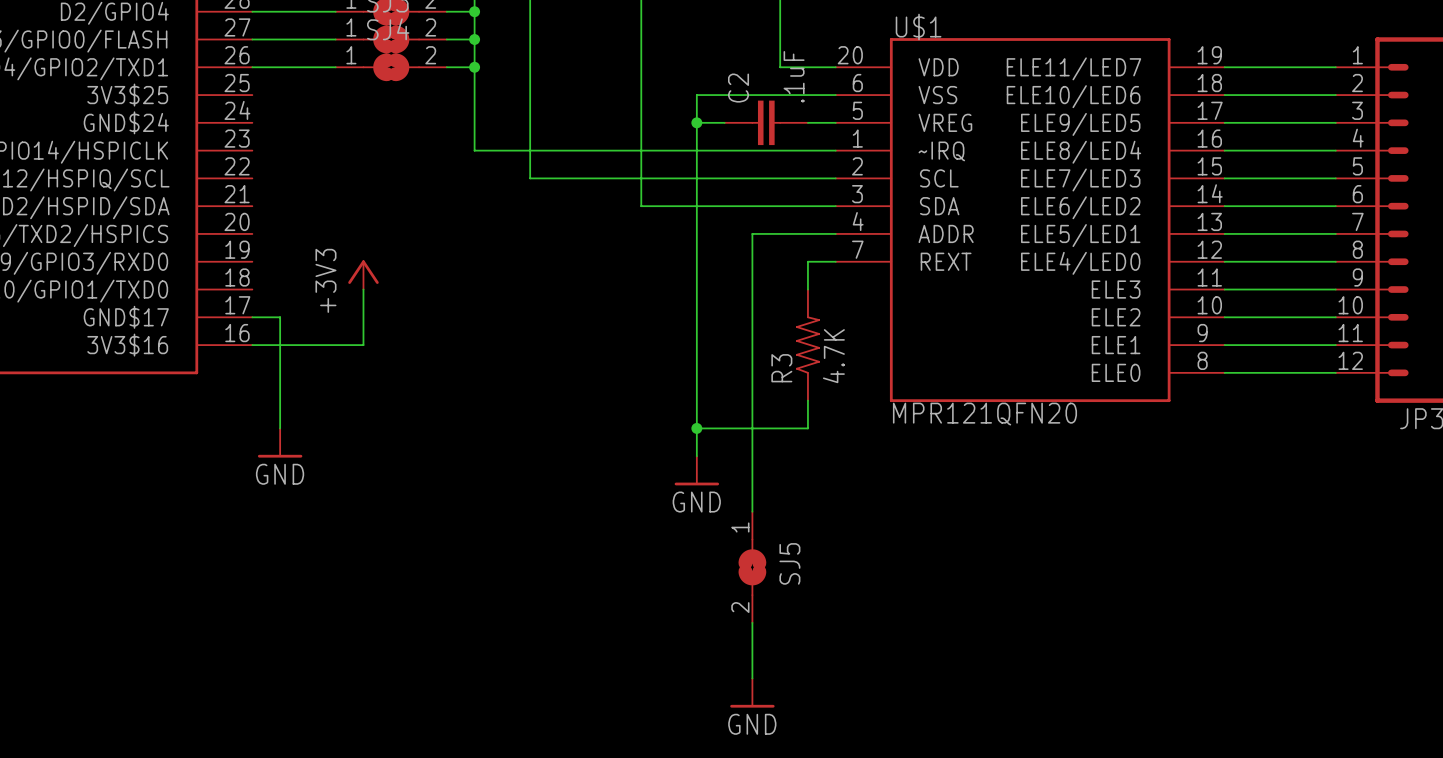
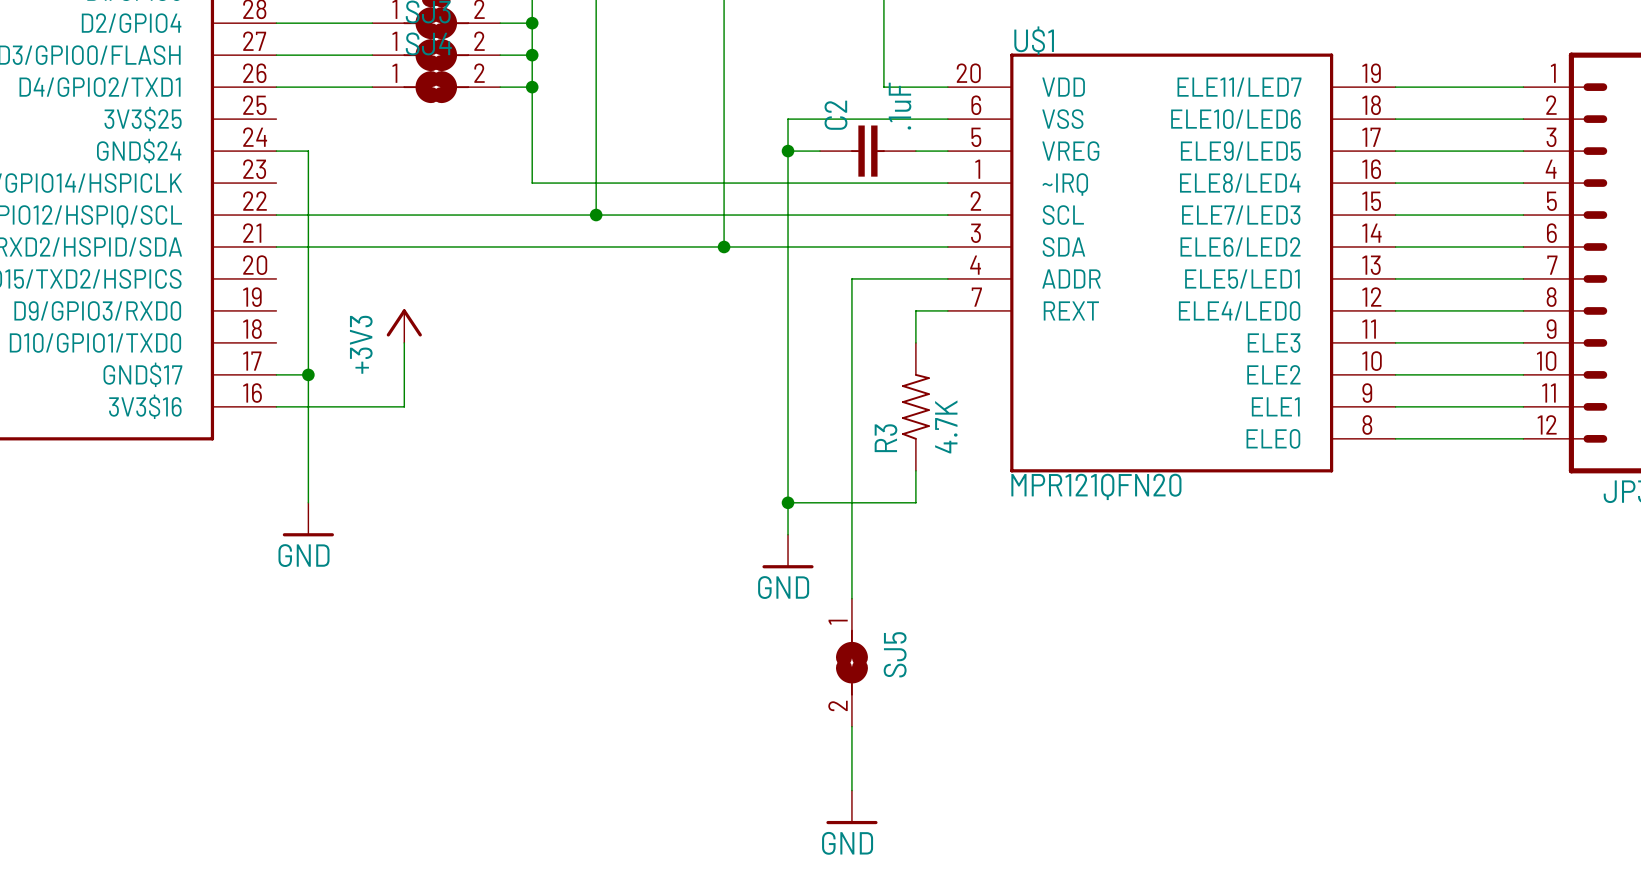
wire: none -> (276, 151) (308, 151) (308, 374)
wire: none -> (276, 215) (596, 215)
junction: none -> (596, 215)
wire: none -> (276, 246) (724, 246)
junction: none -> (724, 246)
junction: none -> (308, 374)

